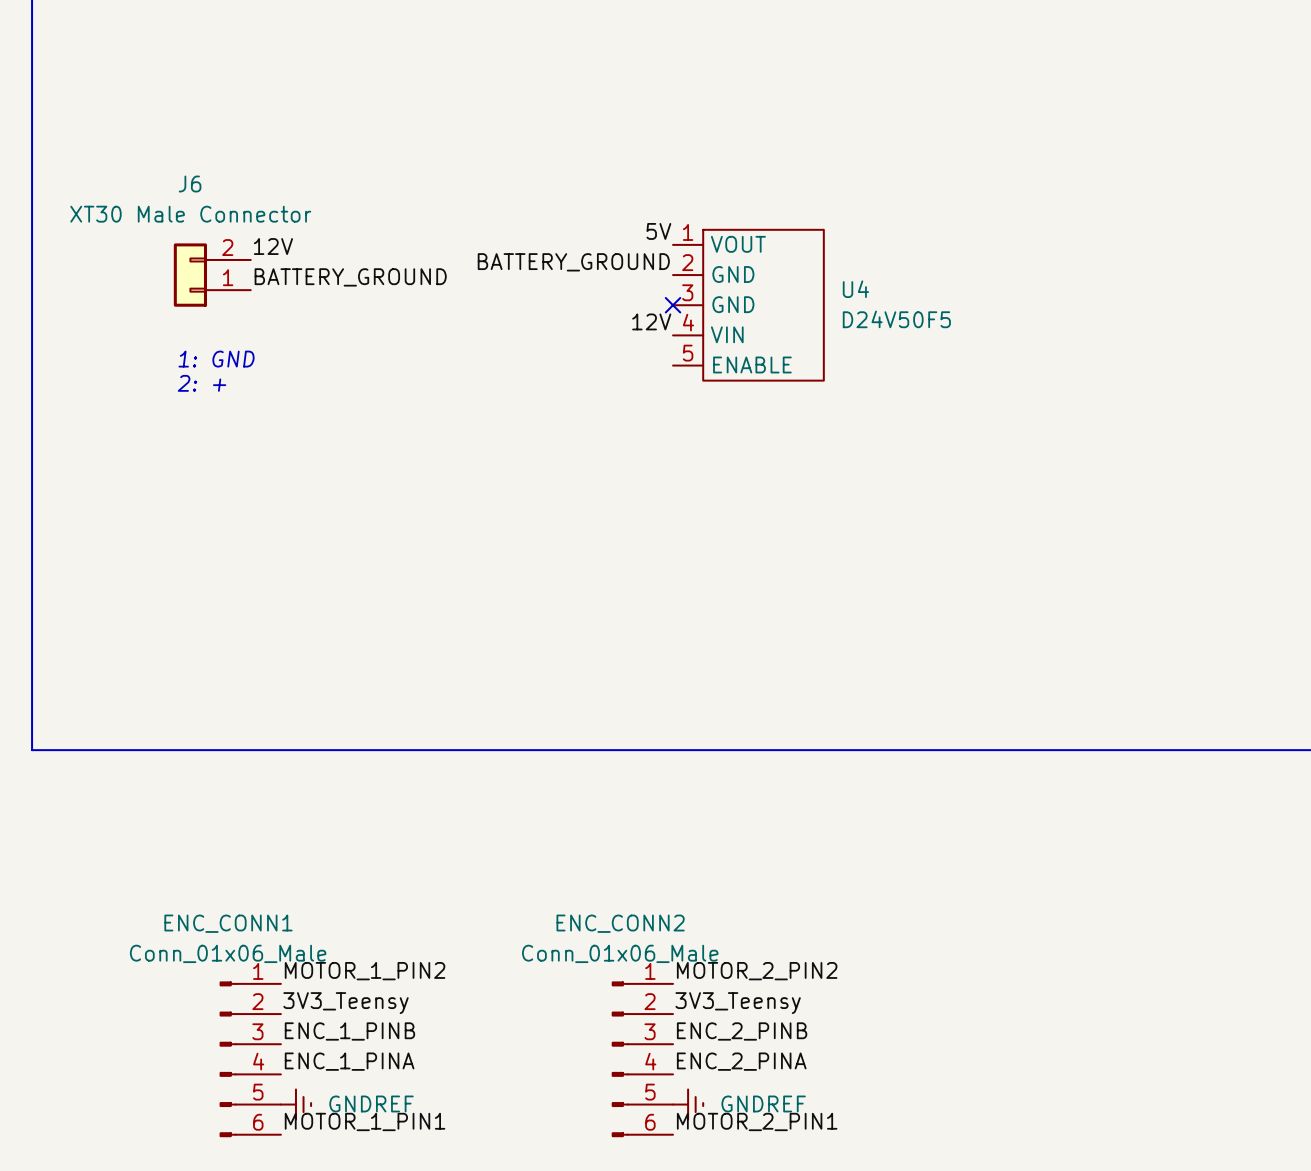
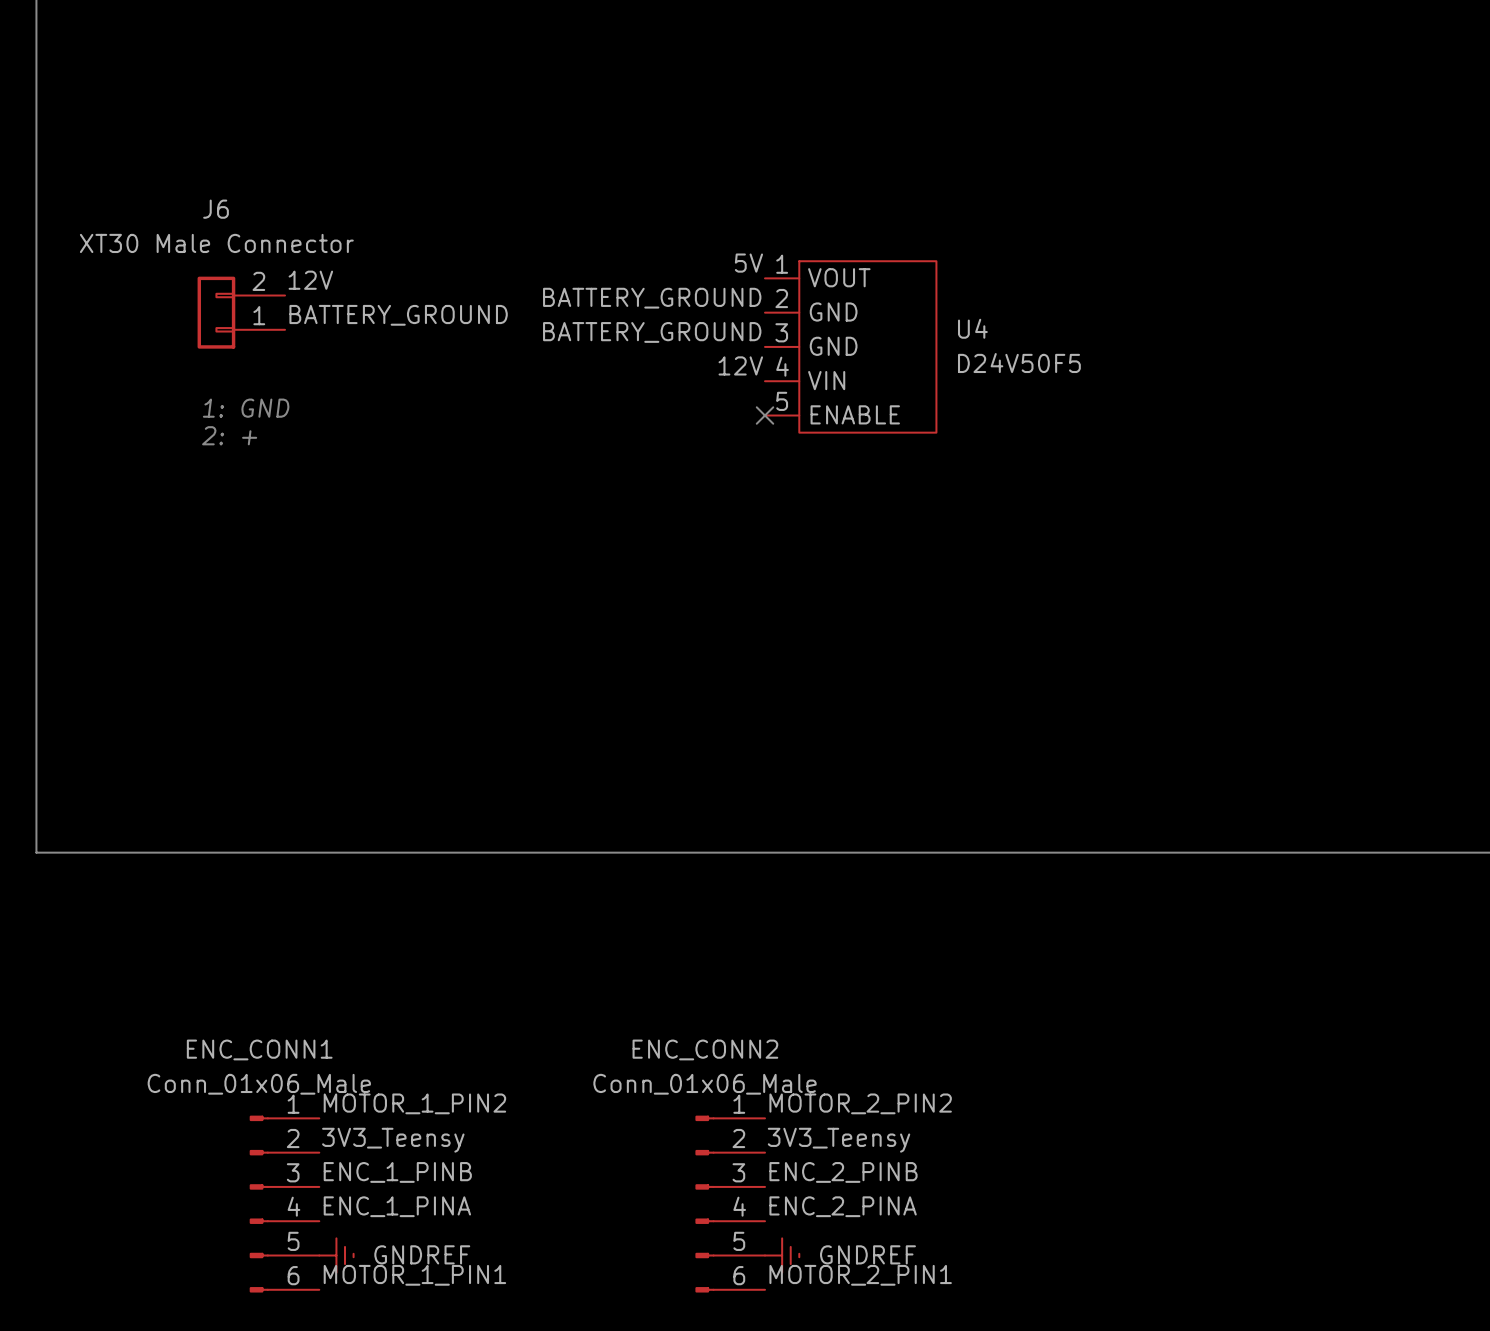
label: none -> BATTERY_GROUND (652, 332)
no-connect mark position: (673, 305) -> (765, 415)

